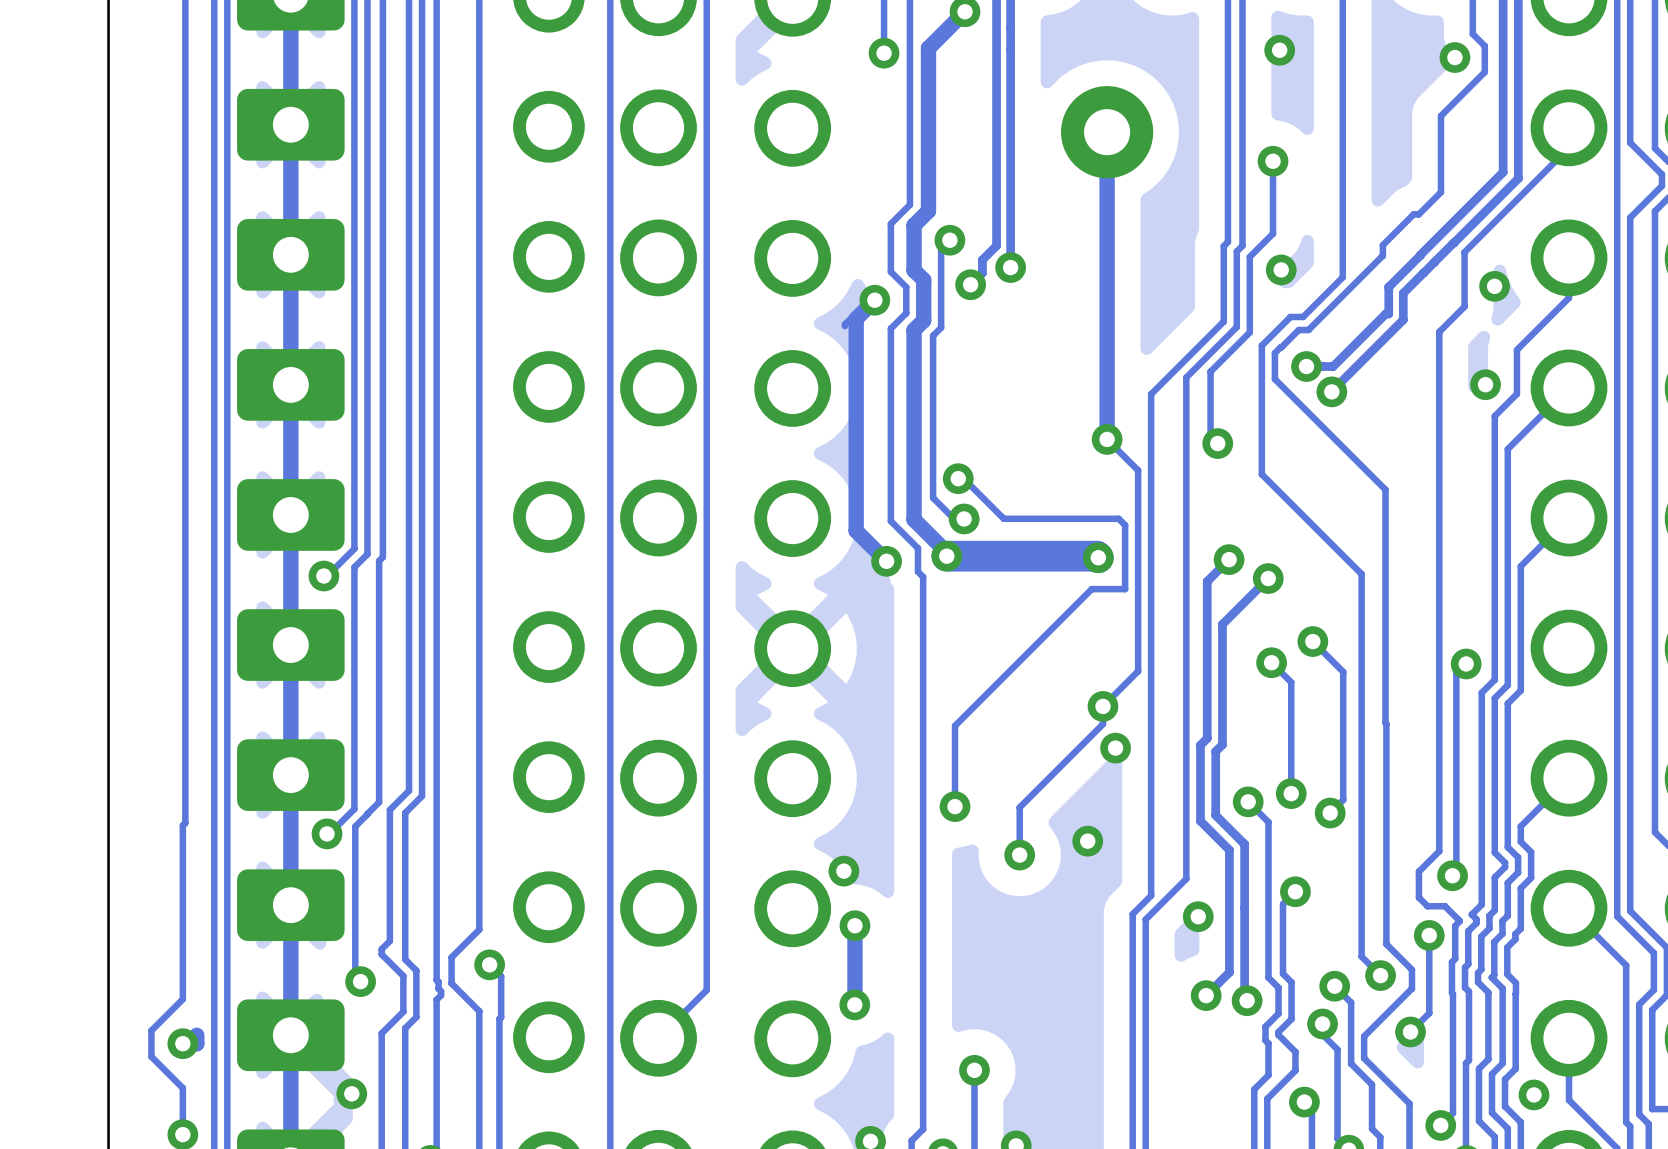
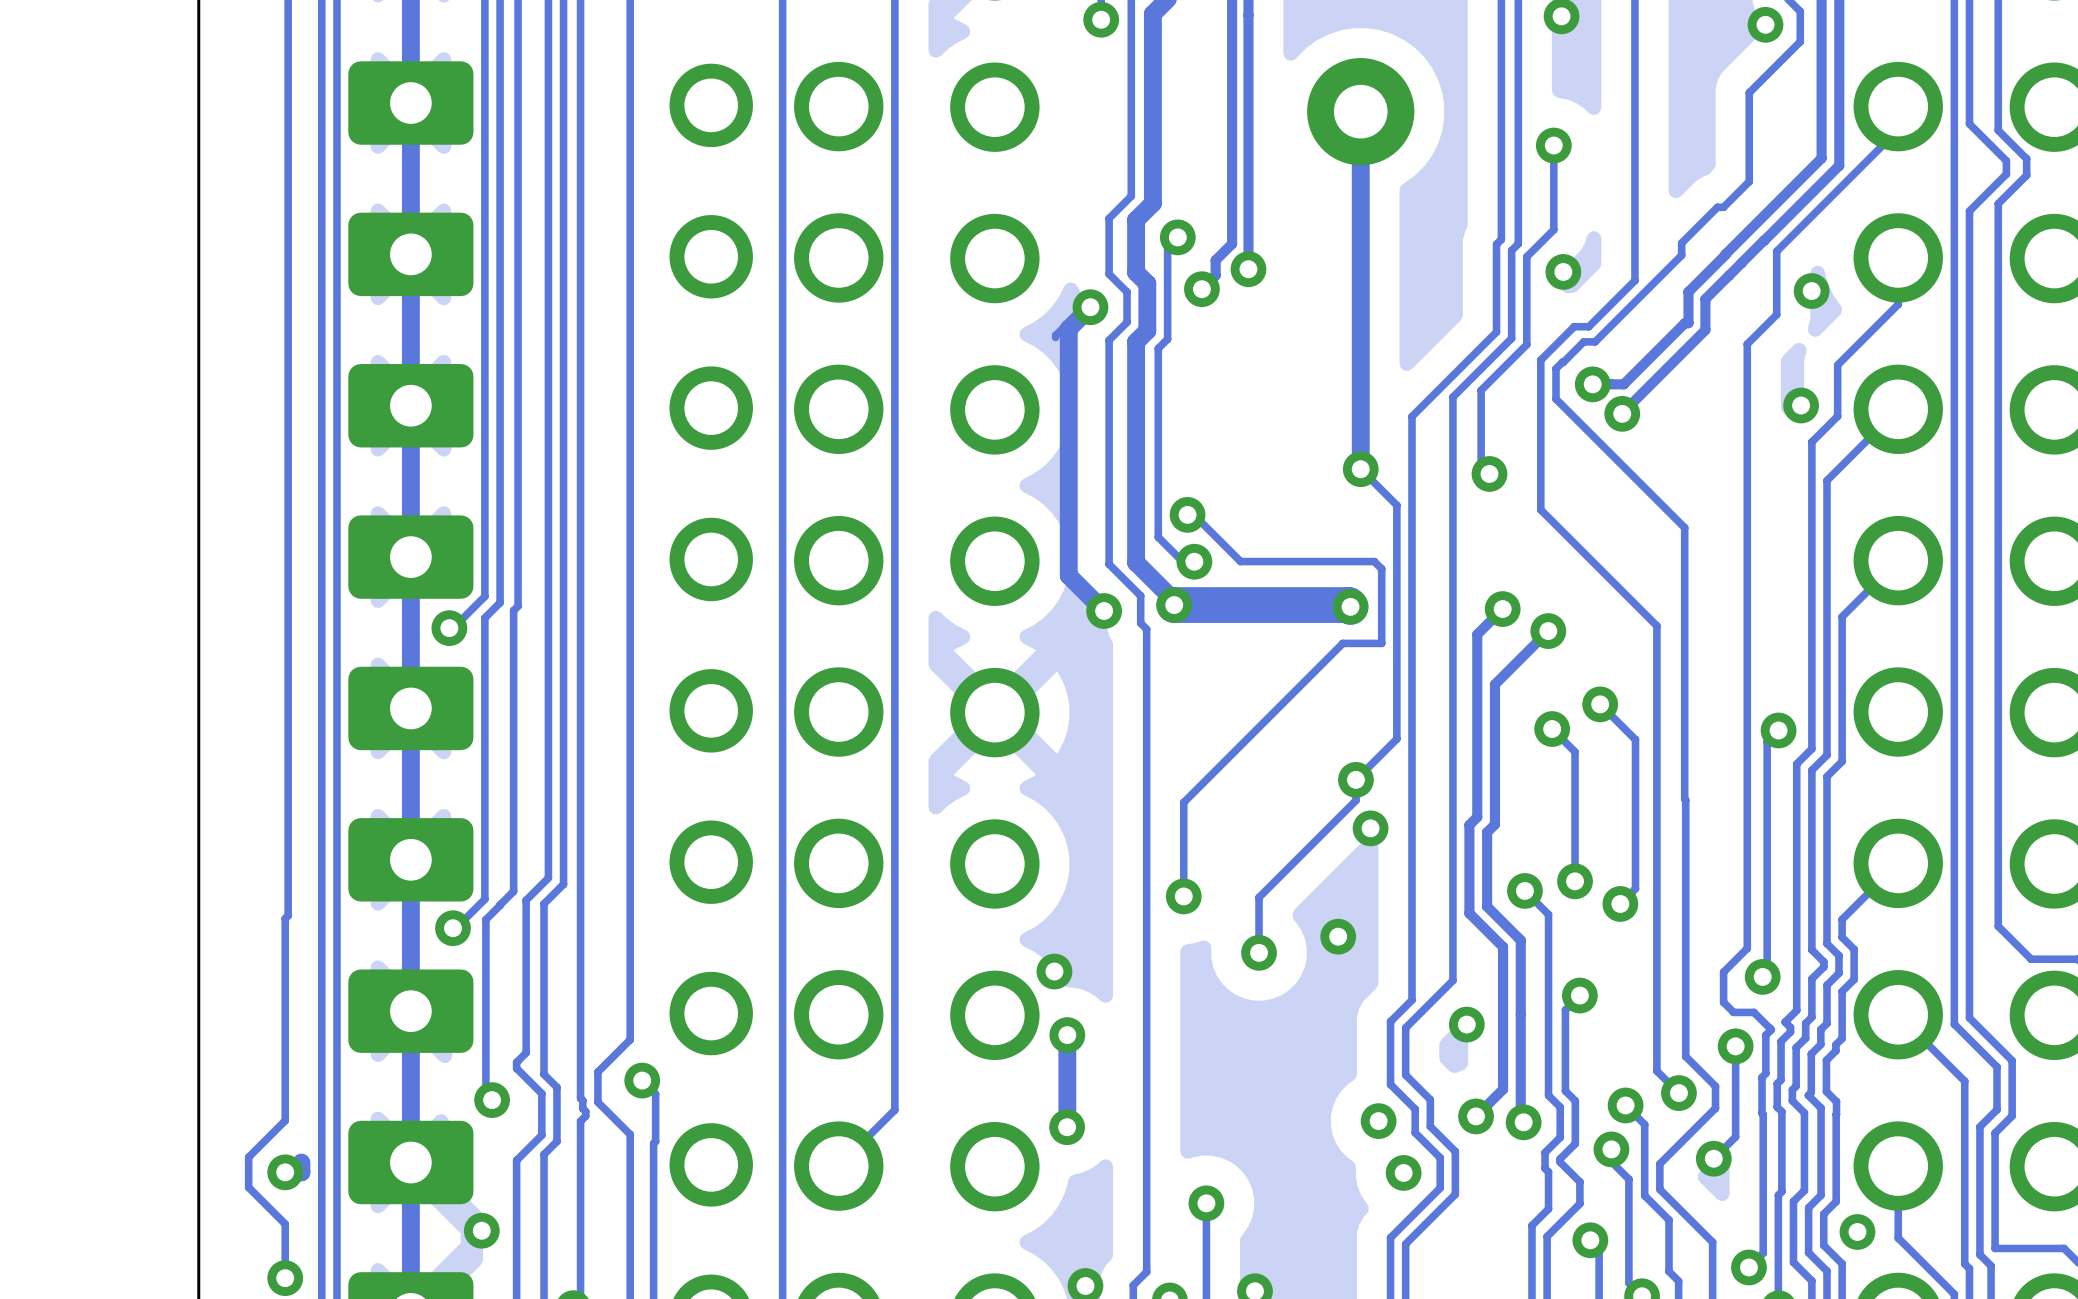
track: (1145, 960) (1145, 1105) -> (1405, 1075) (1430, 1099) (1430, 1126) (1455, 1151) (1455, 1194) (1405, 1244)
track: (1132, 968) (1132, 1099) -> (1390, 1084) (1415, 1109) (1415, 1132) (1440, 1157) (1440, 1188) (1390, 1237)
via: none -> (1378, 1121)
via: none -> (1403, 1172)

